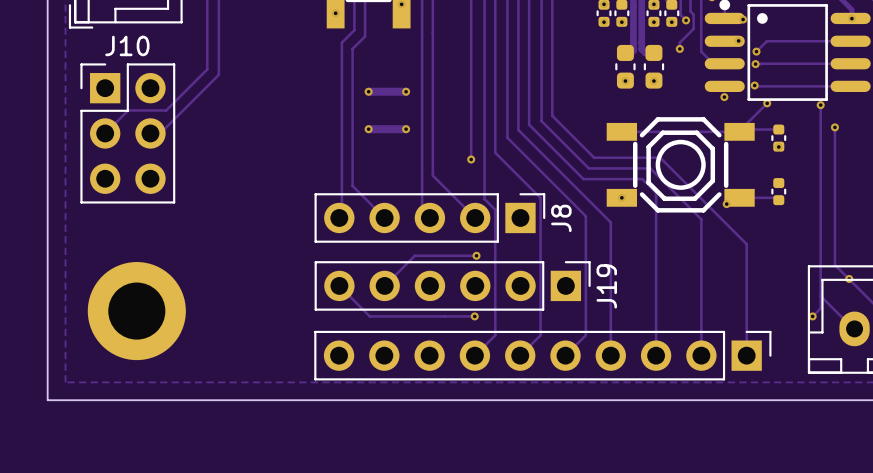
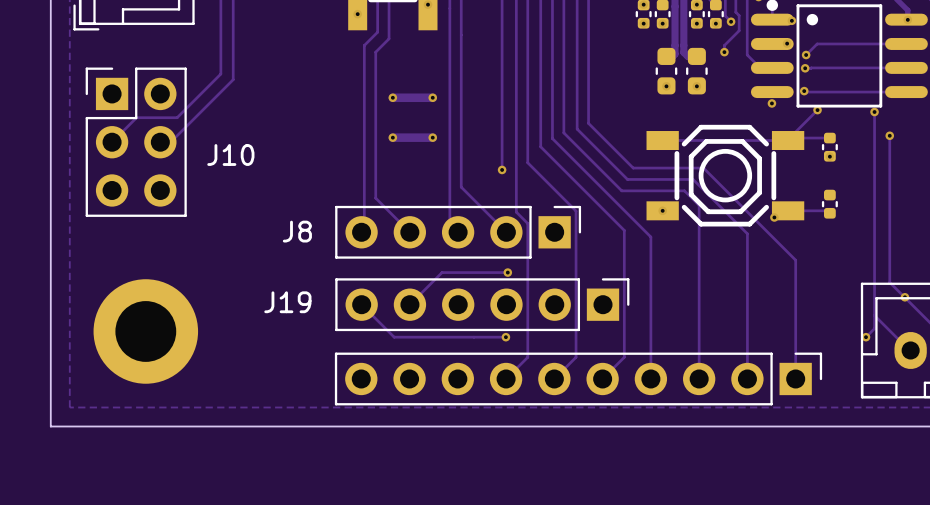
J10 name position: J10 (127, 45) -> J10 (230, 155)
J8 name rotation: 0° (561, 218) -> 90° clockwise (297, 231)
J8 name position: J8 (561, 218) -> J8 (297, 231)
J19 name rotation: 0° (606, 286) -> 90° clockwise (287, 302)
J19 name position: J19 (606, 286) -> J19 (287, 302)

